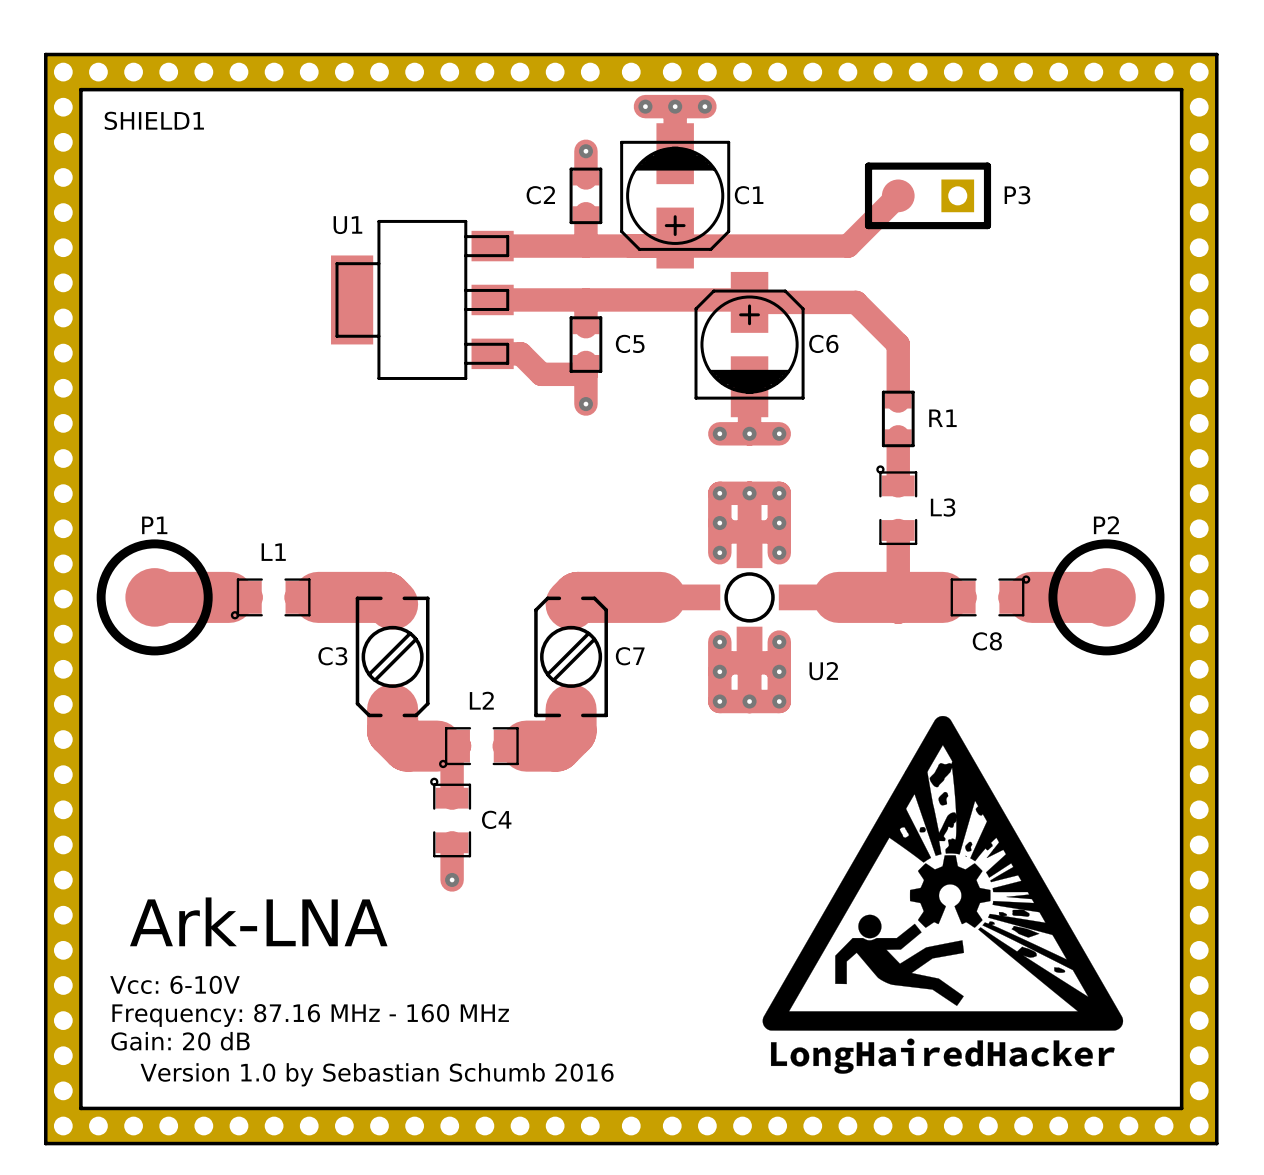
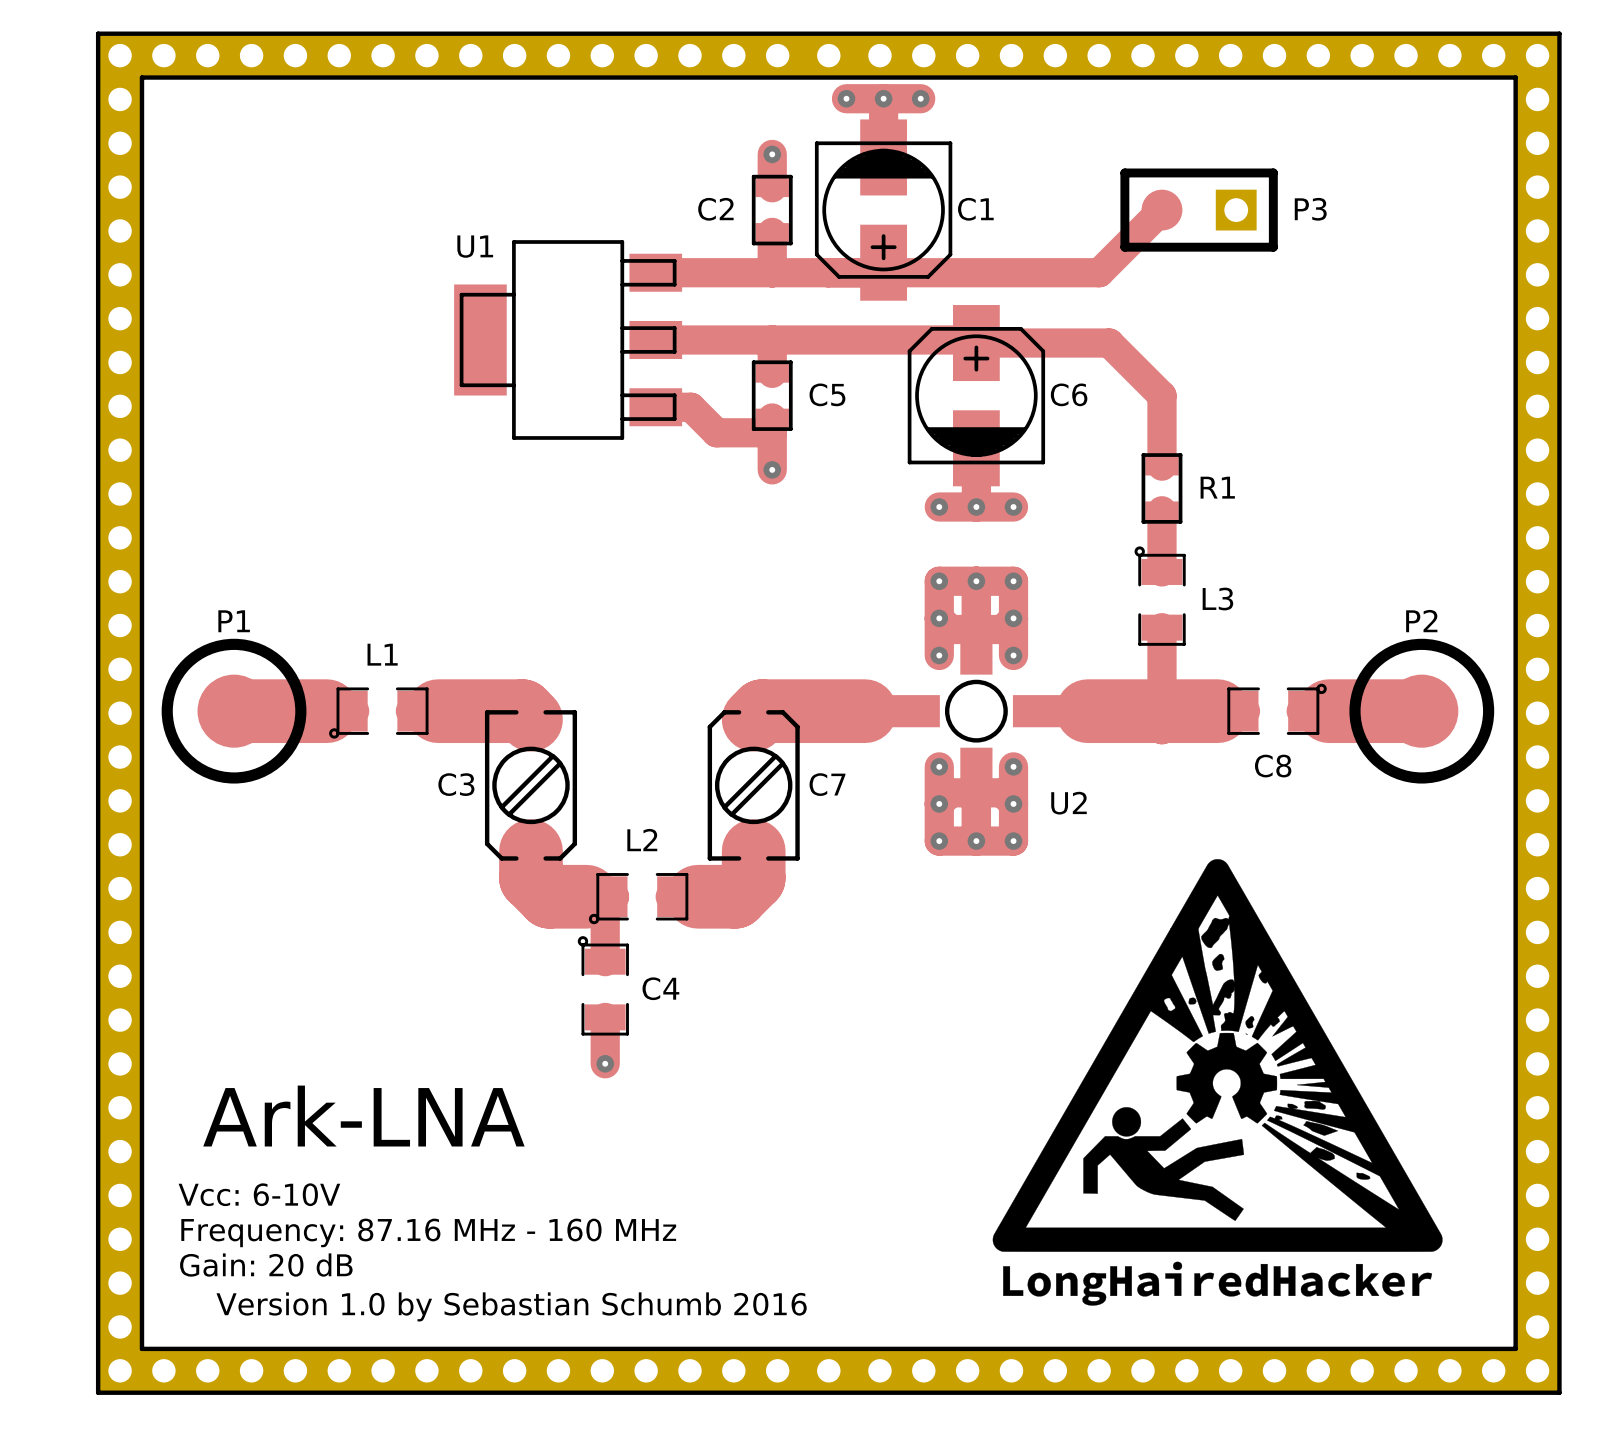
SHIELD1 name: SHIELD1 (154, 120) -> none

